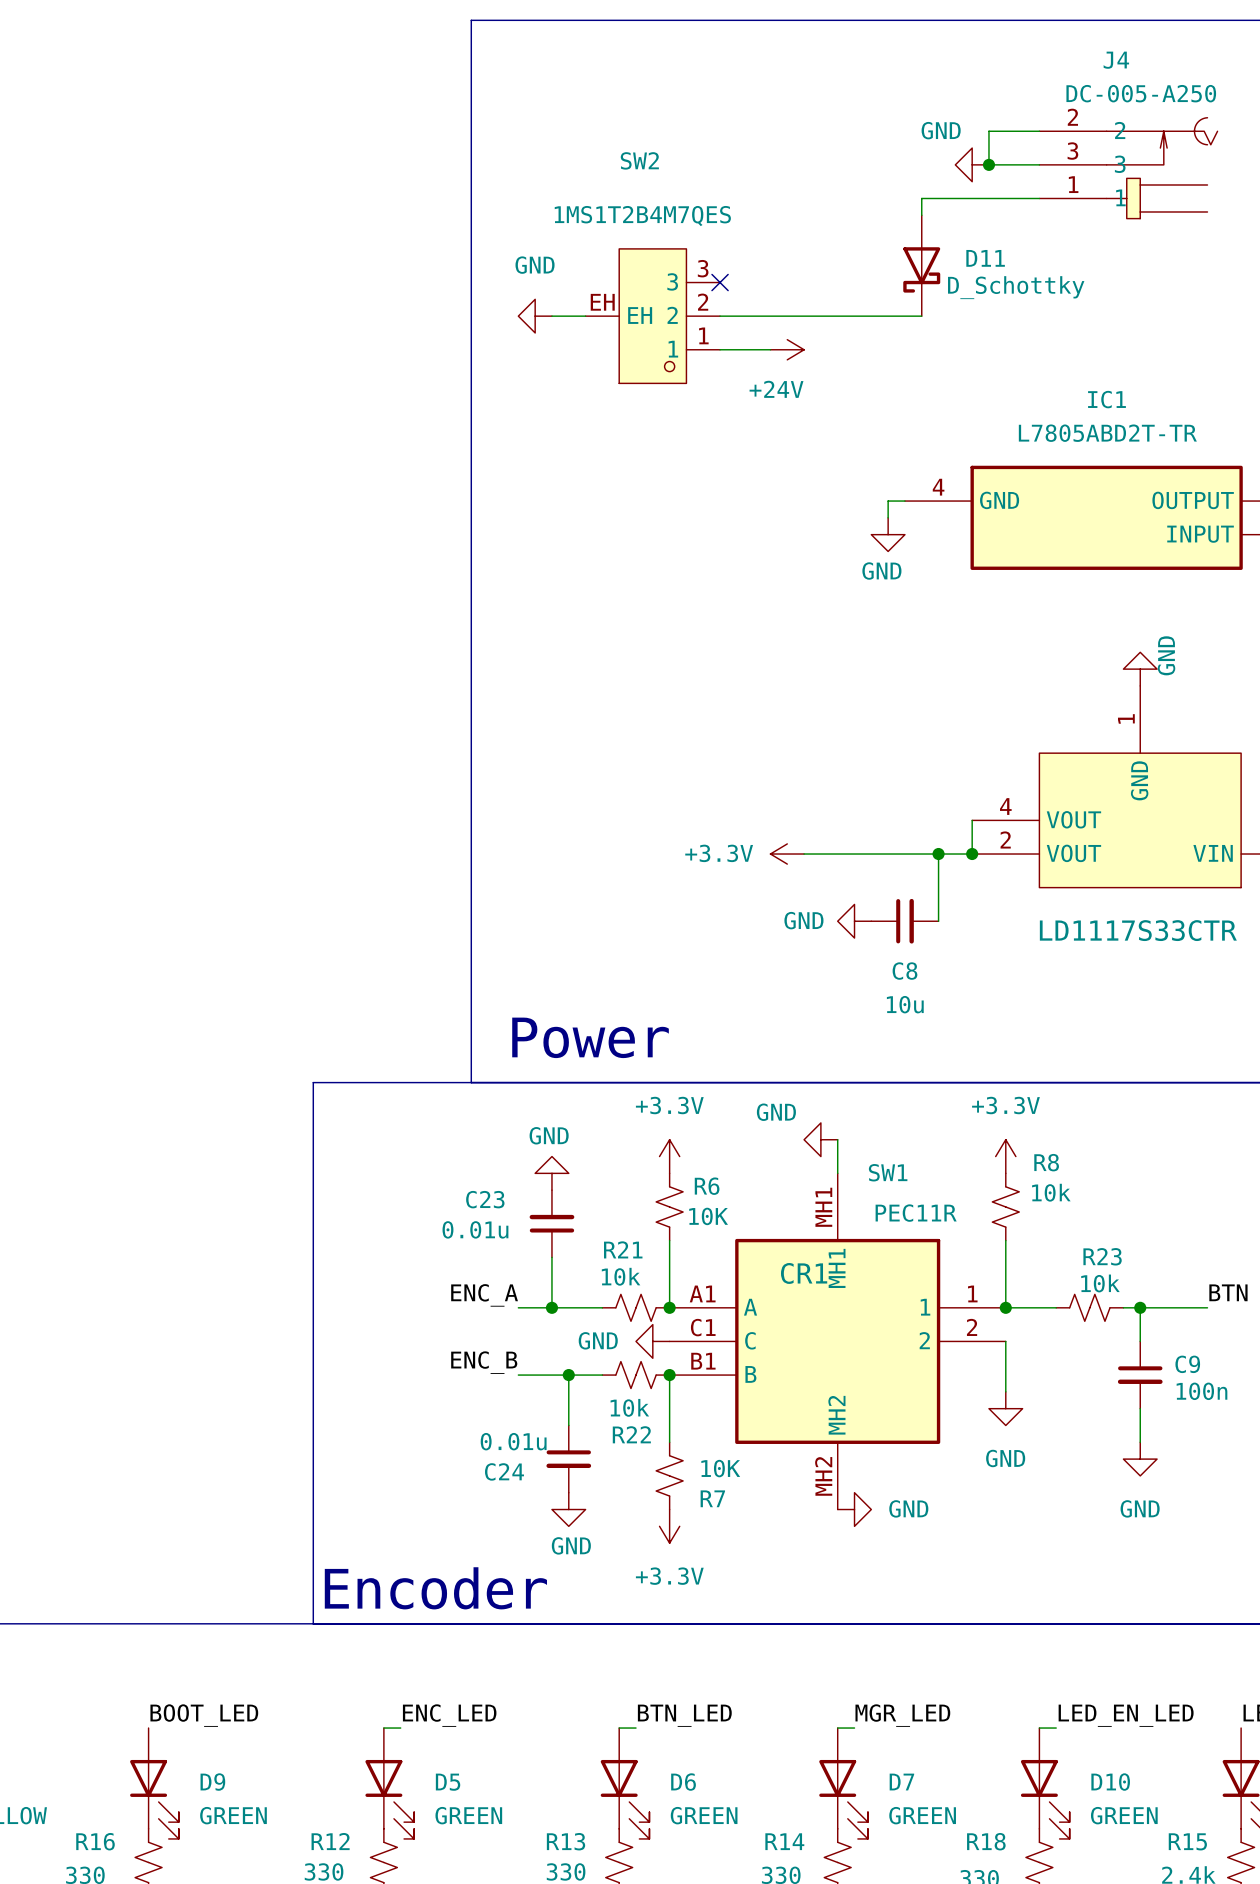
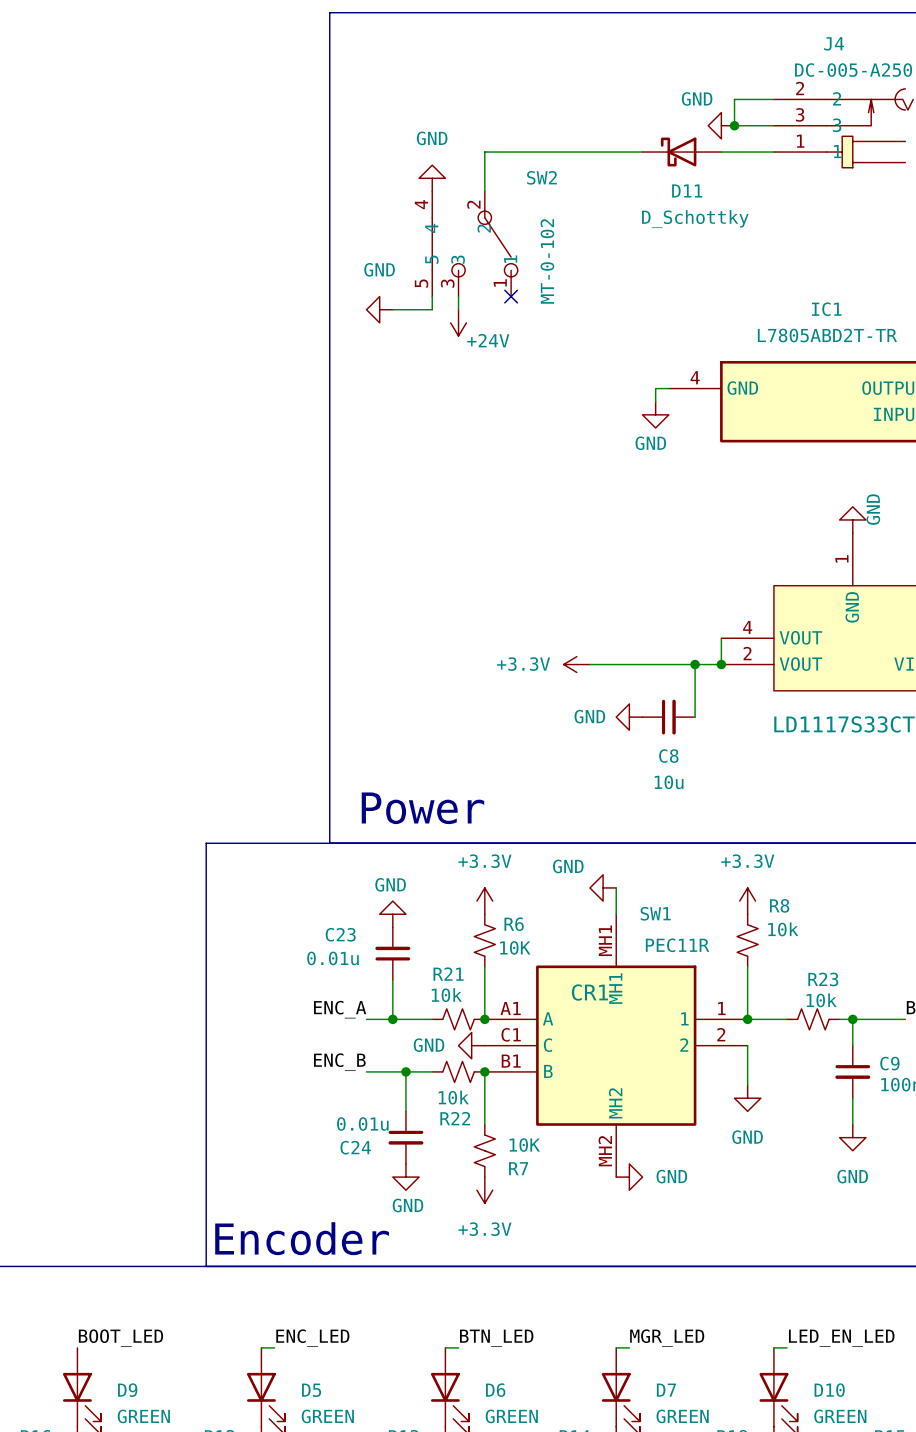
SW2 name position: SW2 (639, 160) -> SW2 (541, 177)
wire: none -> (642, 152) (484, 152) (484, 191)
SW2 value: 1MS1T2B4M7QES (642, 216) -> MT-0-102 (547, 261)
power symbol: none -> GND (432, 178)
SW2 symbol: [585, 248, 721, 384] -> [432, 191, 518, 297]
D11 position: (921, 265) -> (681, 152)
D11 rotation: 0° (921, 269) -> 90° clockwise (678, 152)
no-connect mark: (720, 282) -> none
D11 value position: D_Schottky (1016, 287) -> D_Schottky (695, 219)
power symbol: GND (535, 316) -> none
wire: (551, 316) (585, 316) -> none
wire: (720, 316) (921, 316) -> none
wire: (720, 349) (770, 349) -> none
power symbol rotation: 0° (787, 349) -> 90° clockwise (458, 322)
power symbol position: +24V (787, 349) -> +24V (458, 322)
wire: none -> (432, 296) (432, 309) (392, 309)
wire: none -> (458, 296) (458, 309)
no-connect mark: none -> (511, 296)
power symbol text position: +24V (776, 389) -> +24V (488, 340)
power symbol: none -> GND (379, 309)

